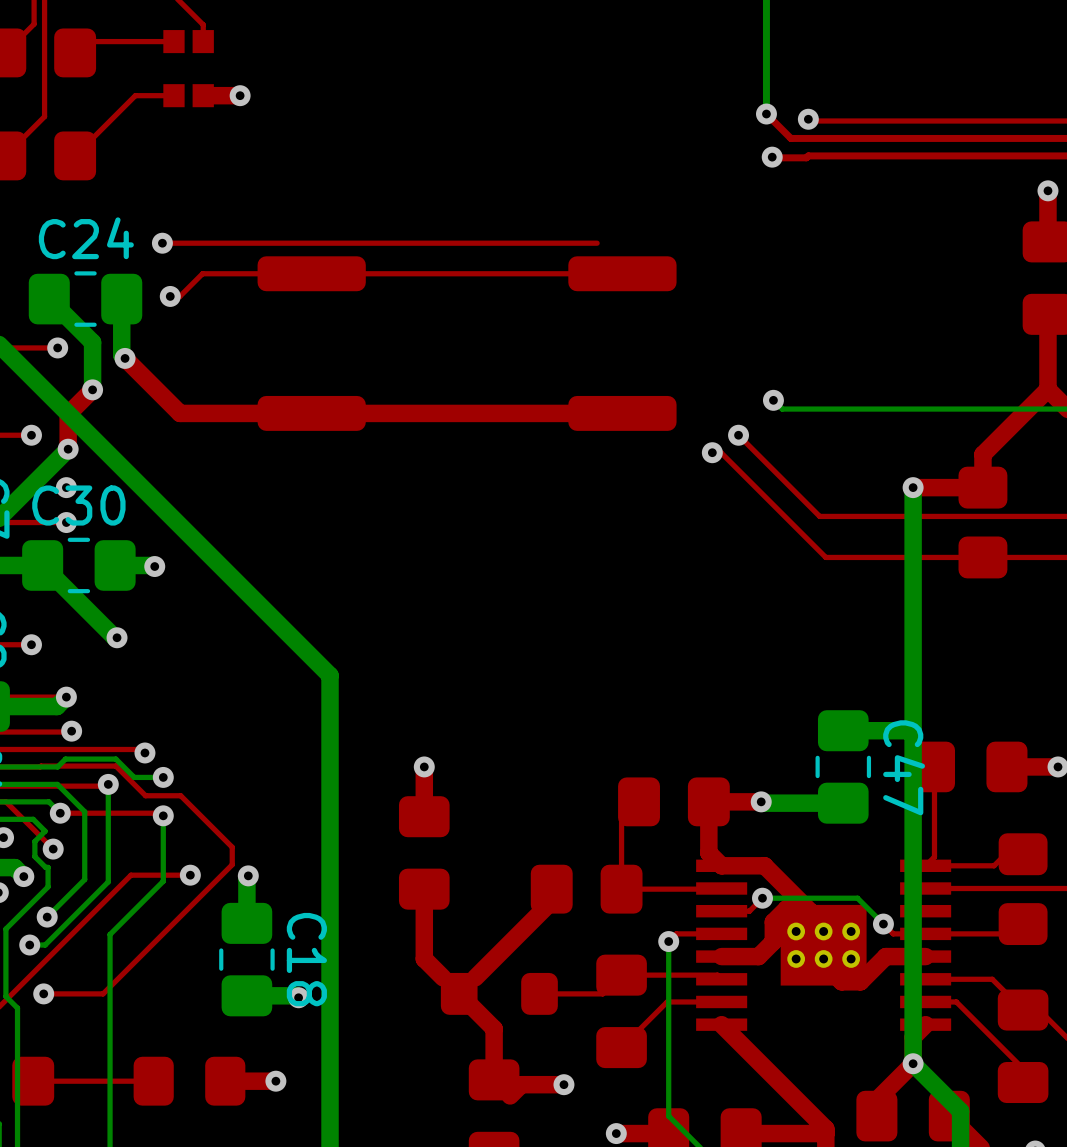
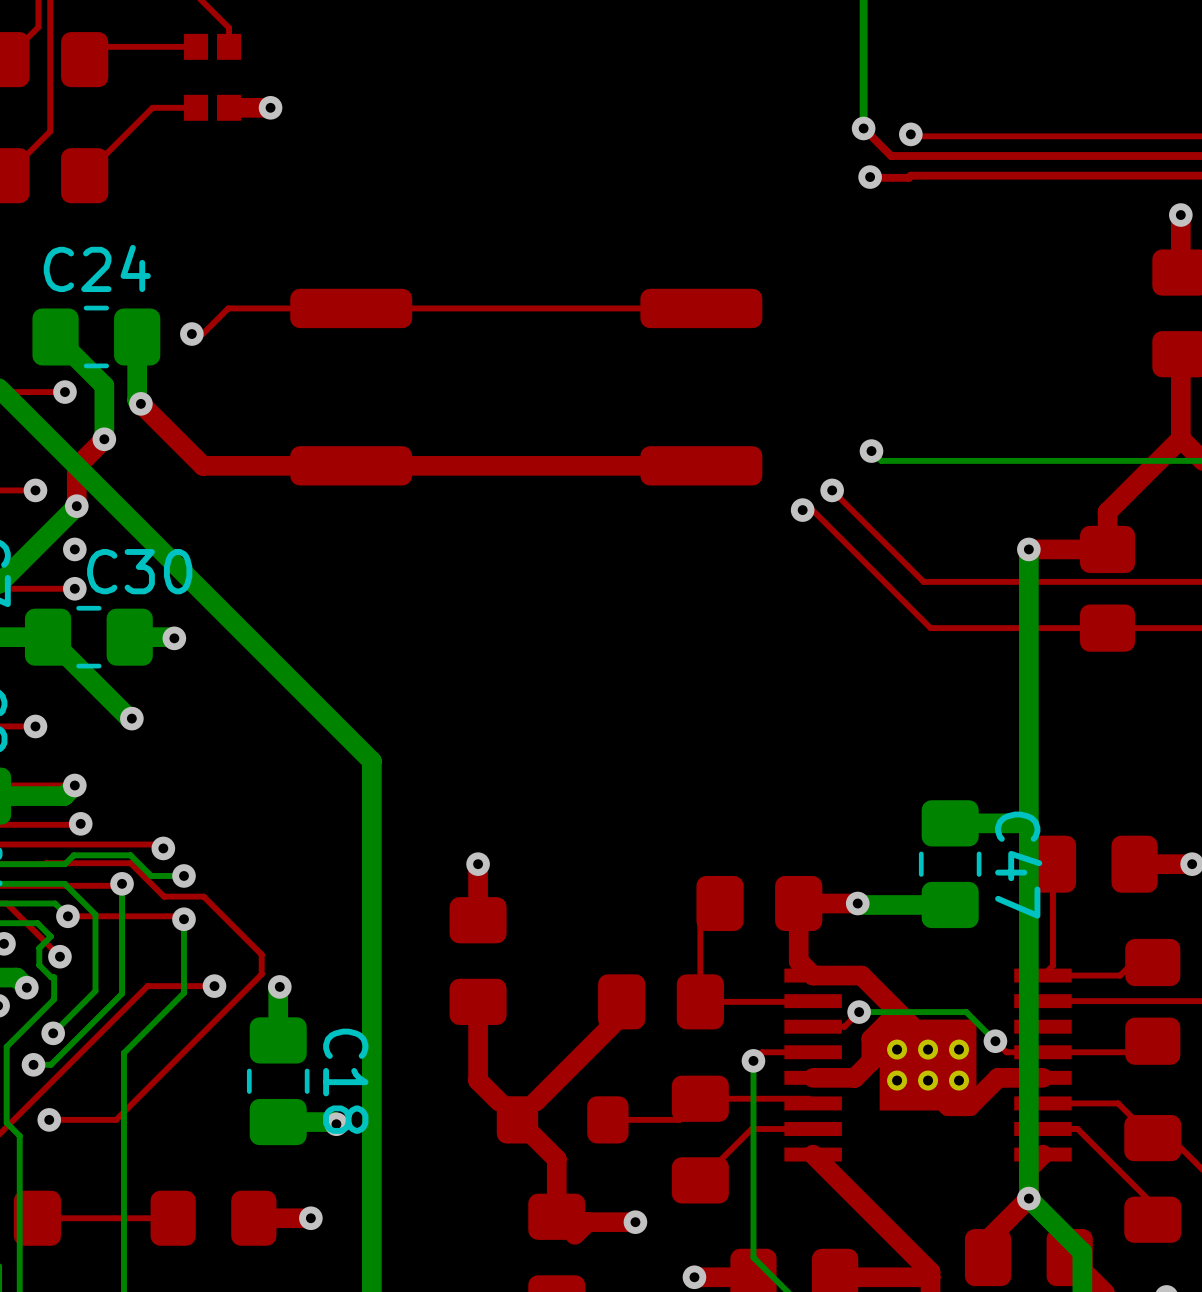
via: (162, 243) -> none
top track: (597, 243) (162, 243) -> none
C30 name position: C30 (78, 505) -> C30 (139, 571)

